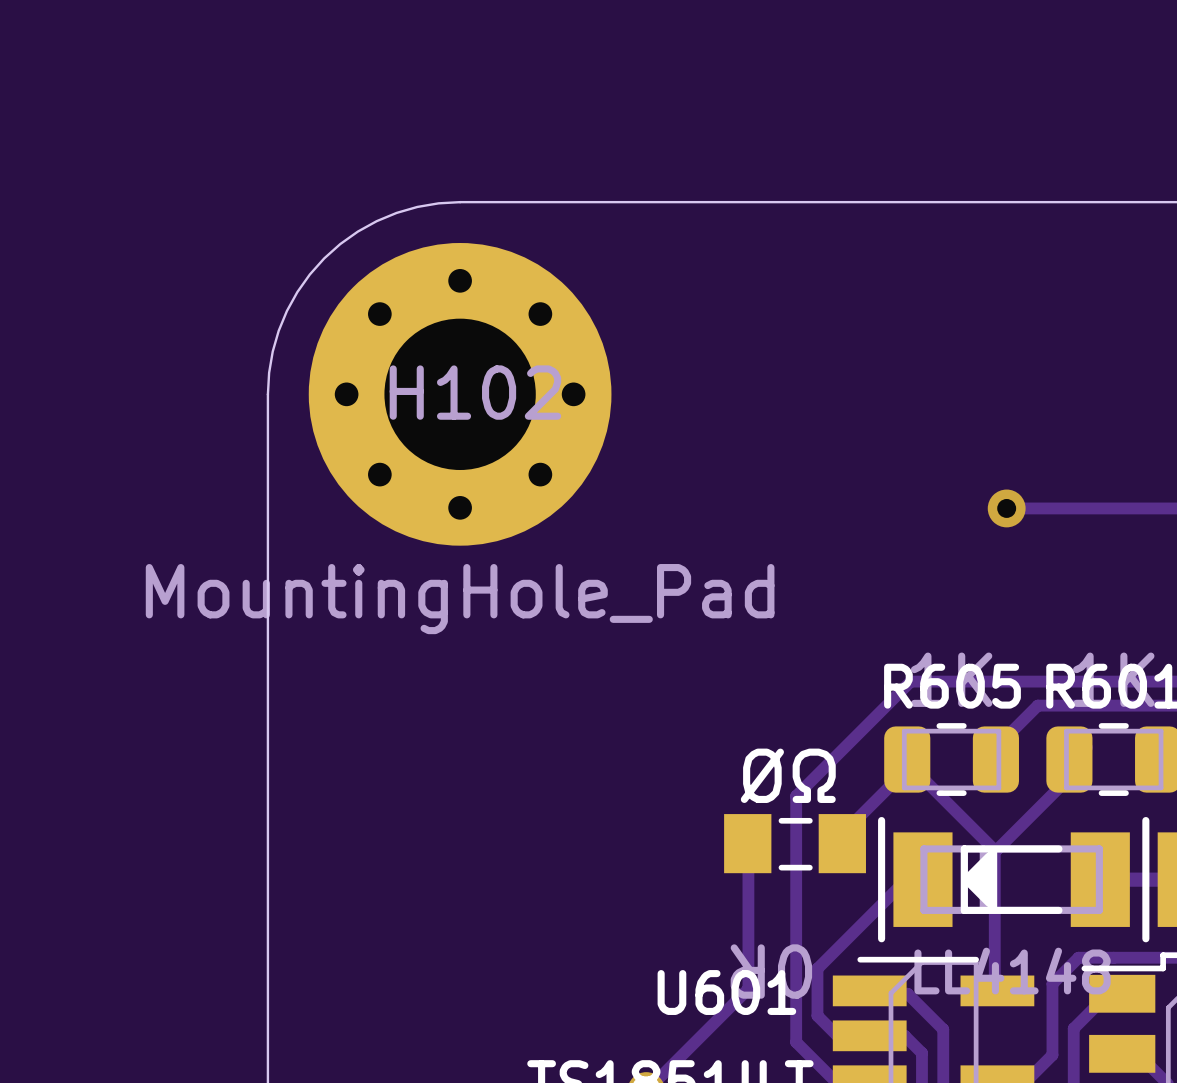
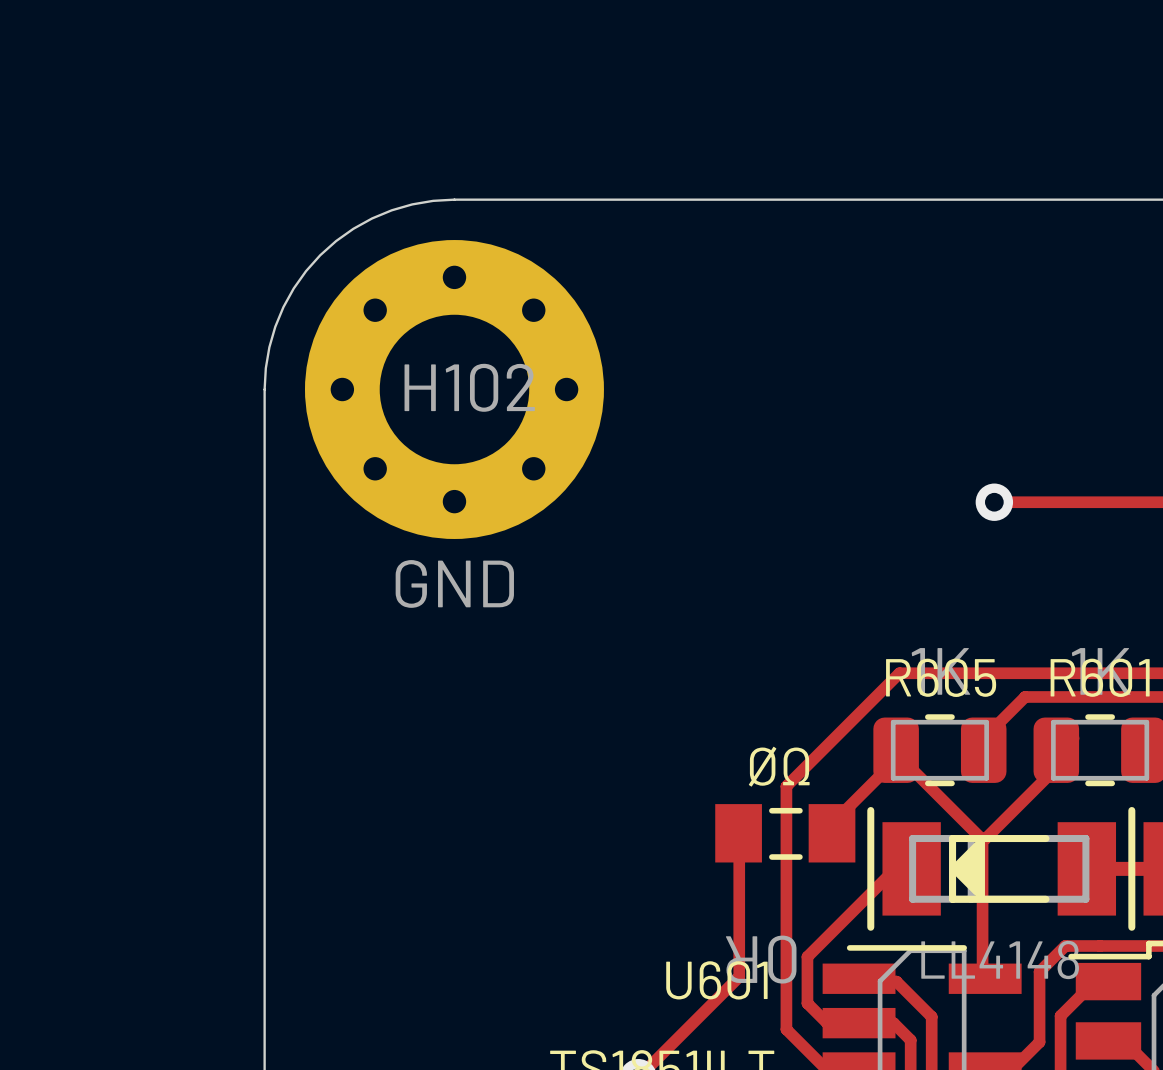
H102 value: MountingHole_Pad (460, 599) -> GND (454, 583)
part footprint: [724, 814, 866, 874] -> [715, 804, 856, 863]

